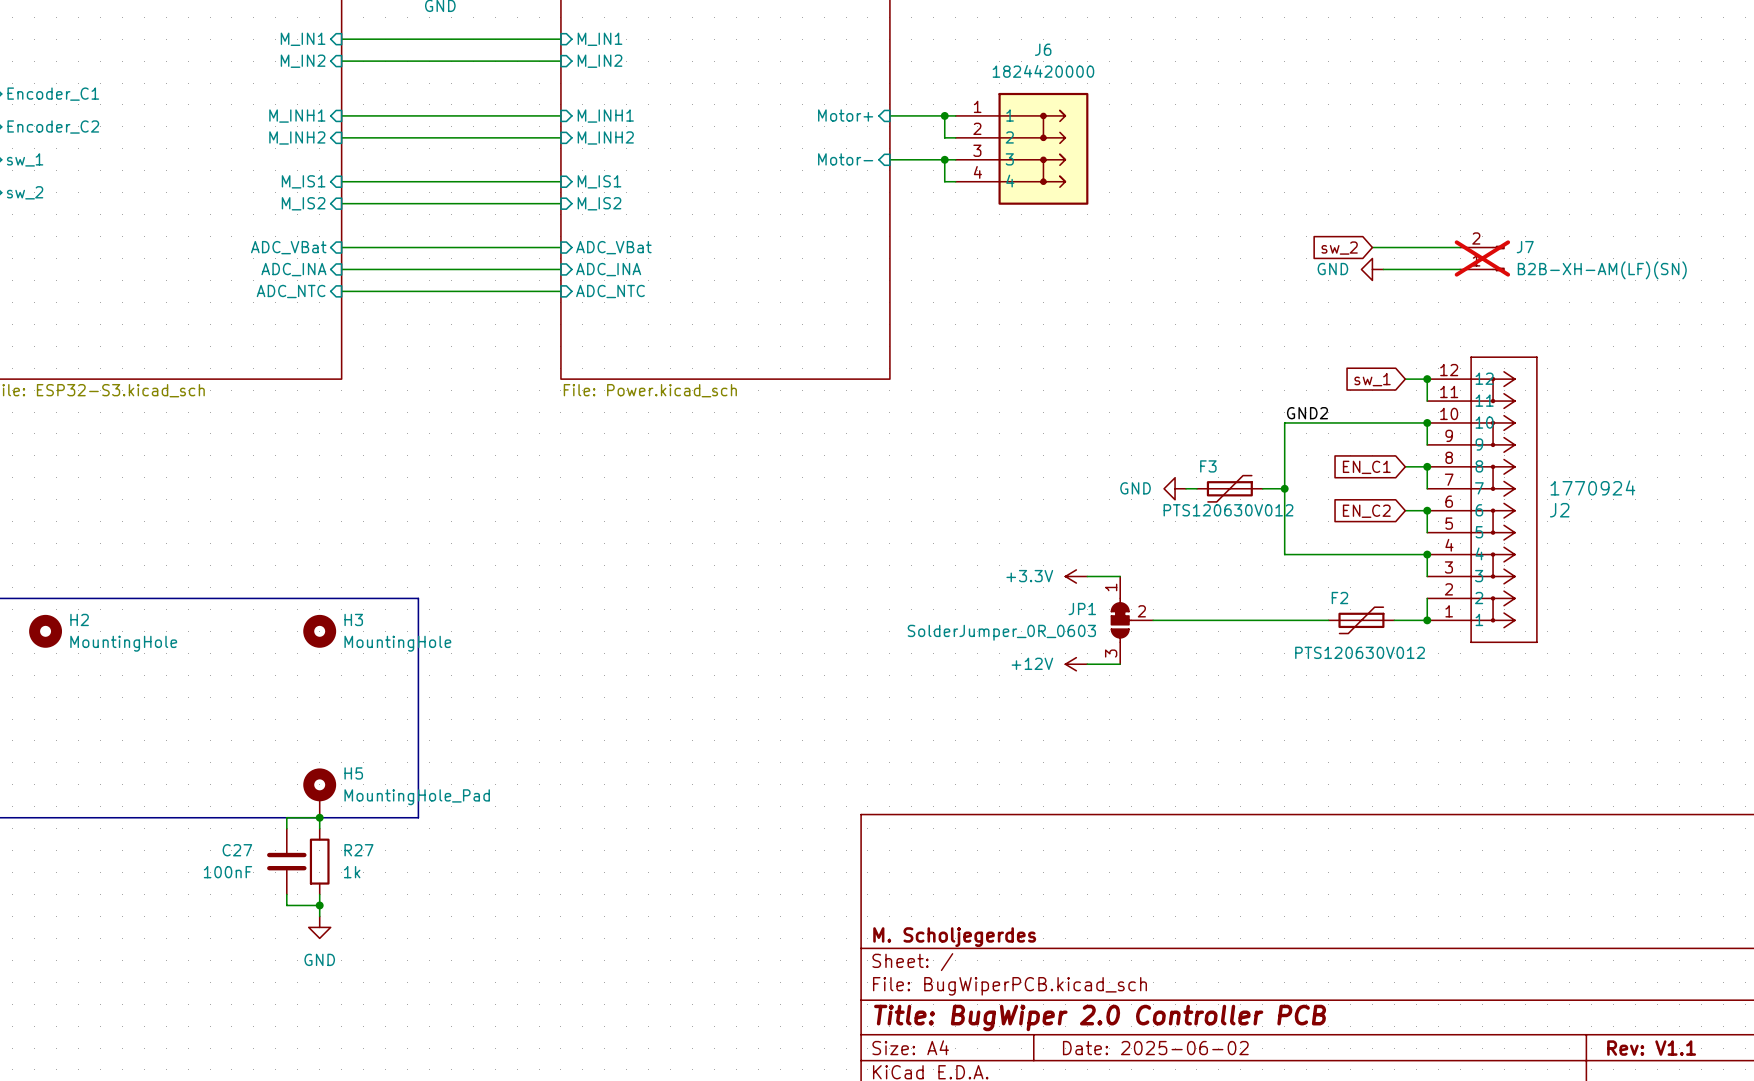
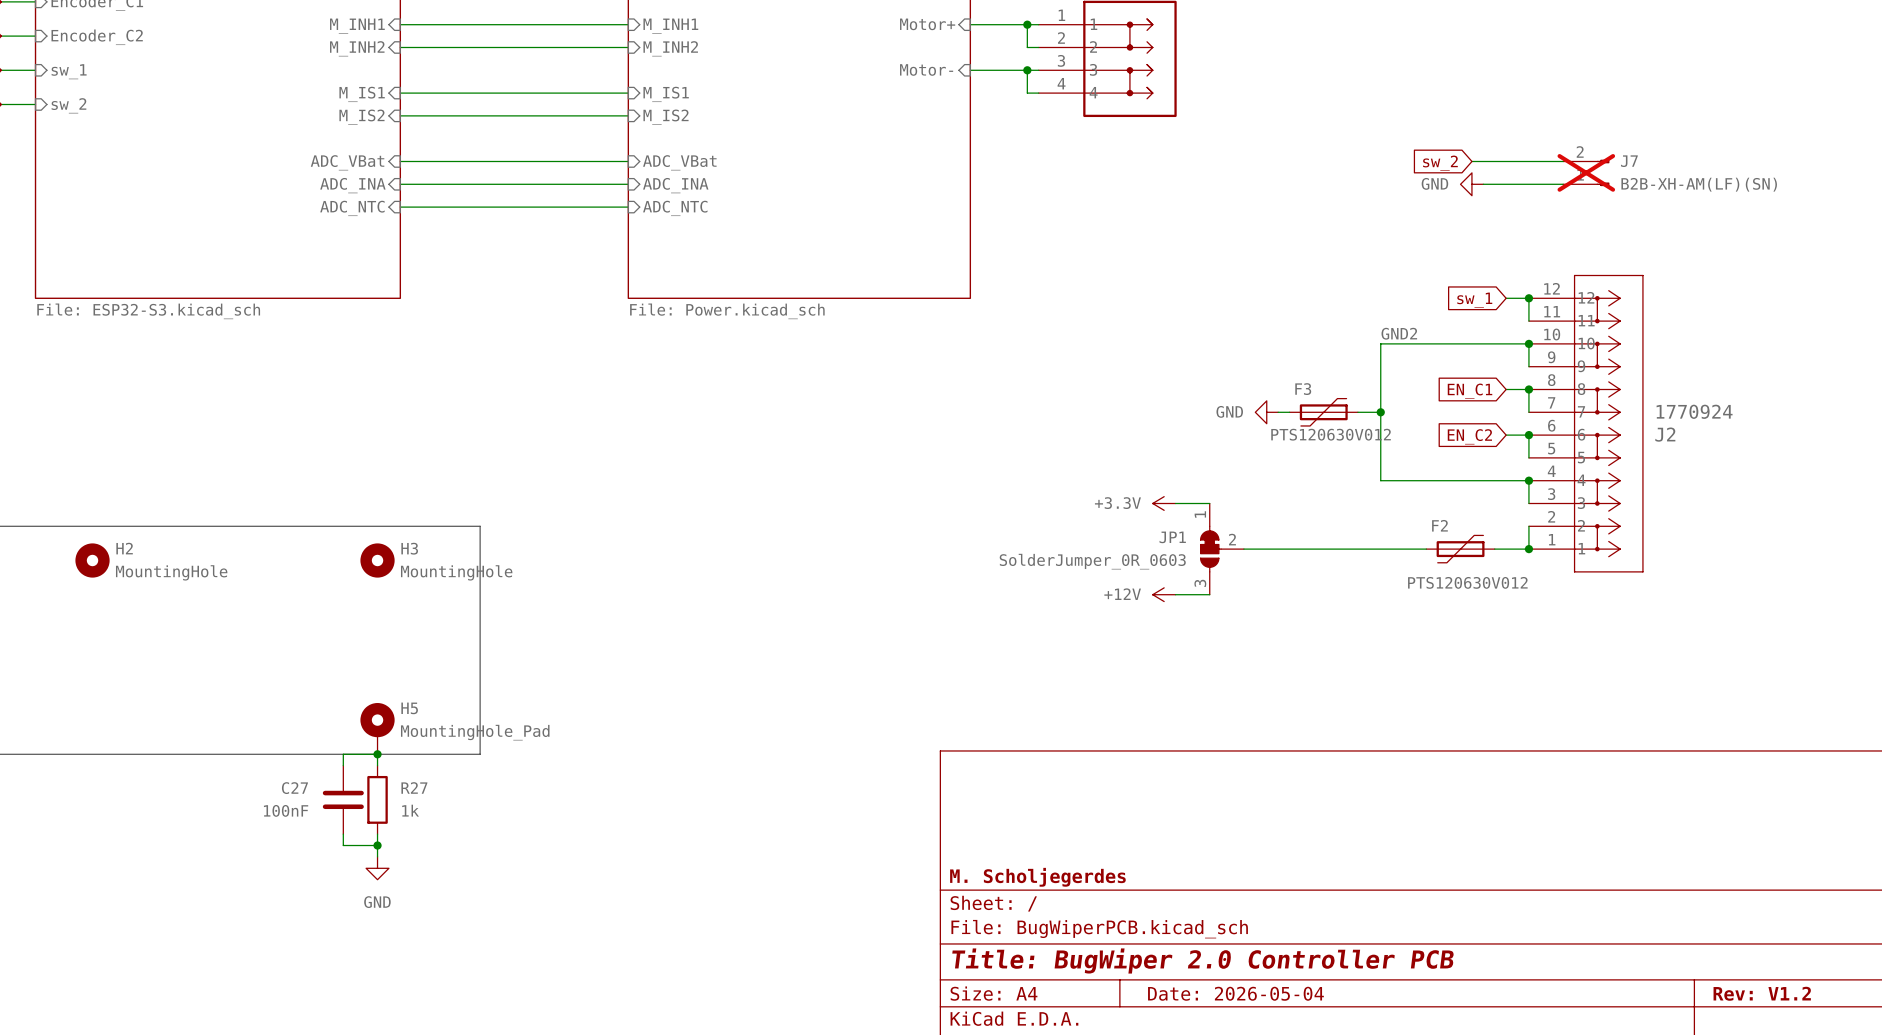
title block: Date: 2025-06-02 (1155, 1048) -> Date: 2026-05-04 (1235, 993)
title block: Rev: V1.1 (1651, 1048) -> Rev: V1.2 (1762, 993)

